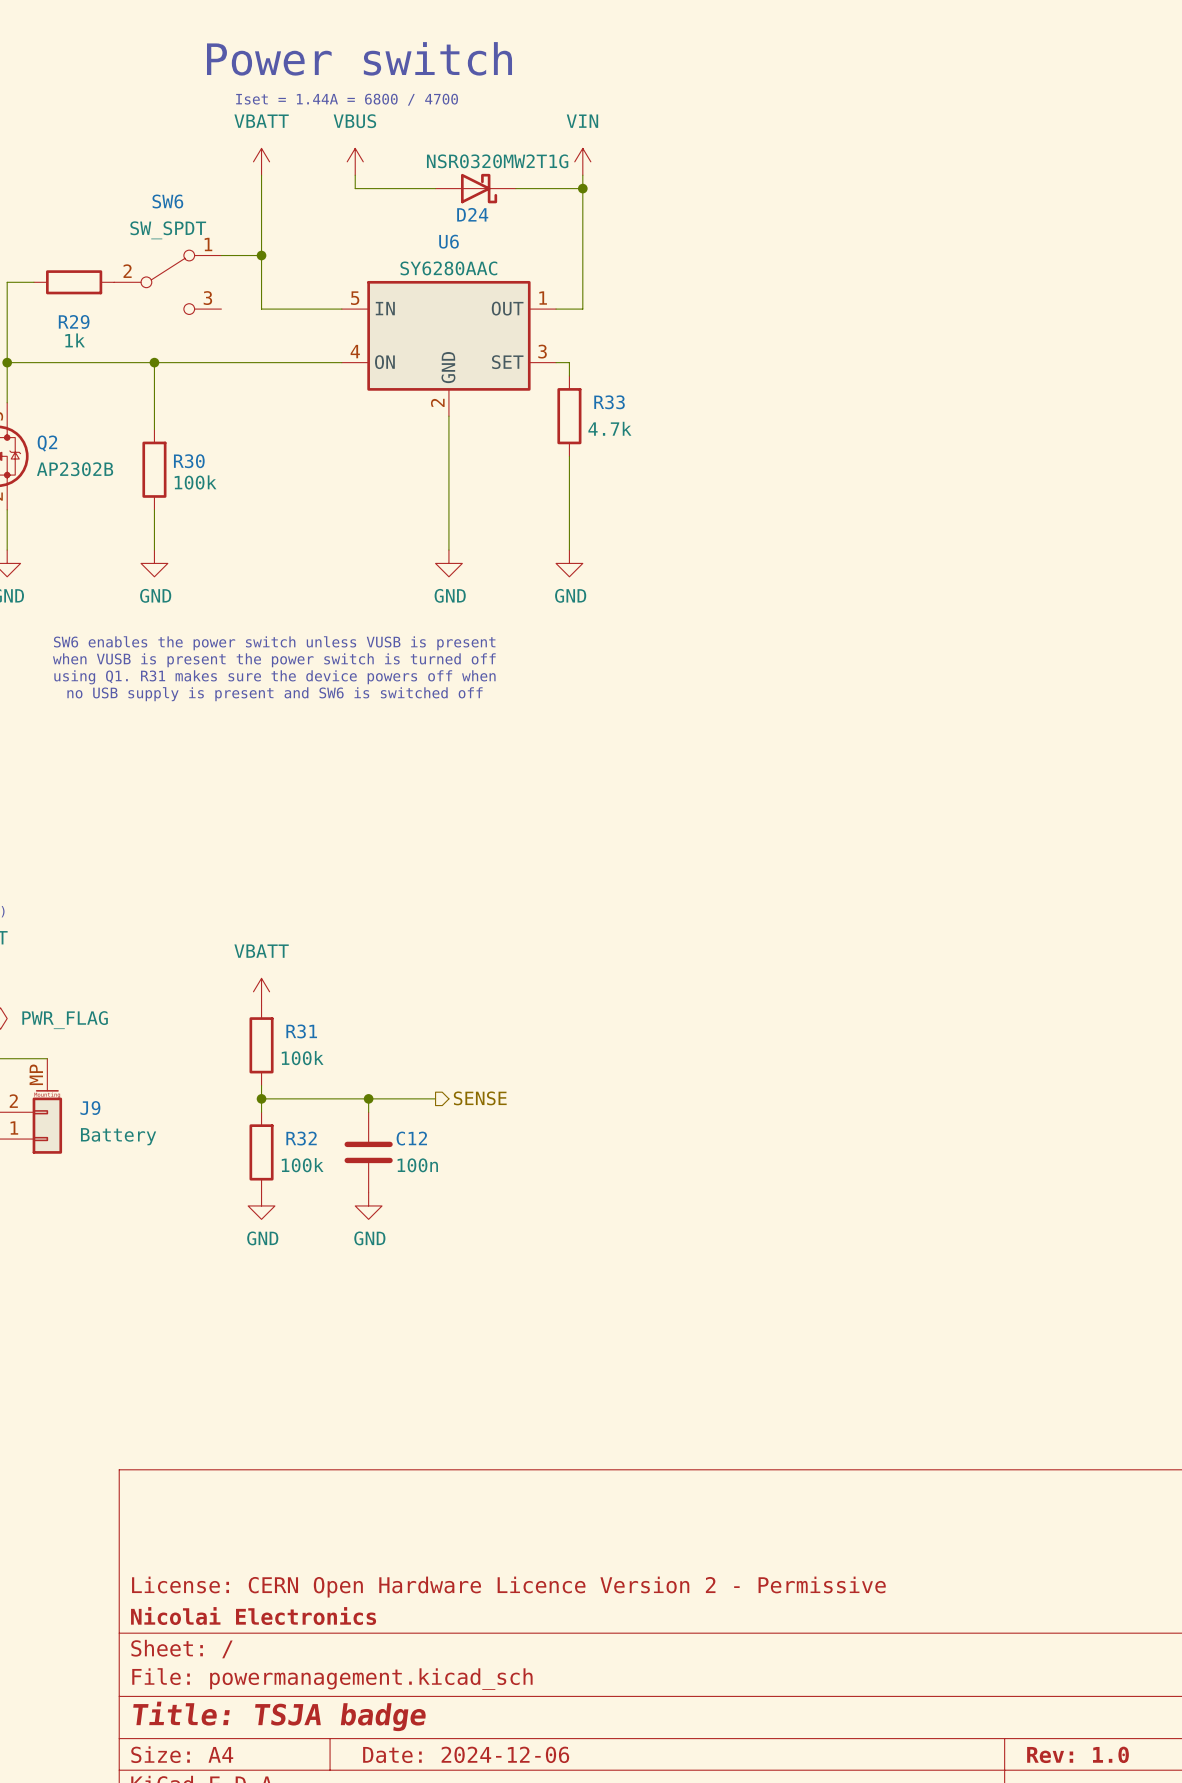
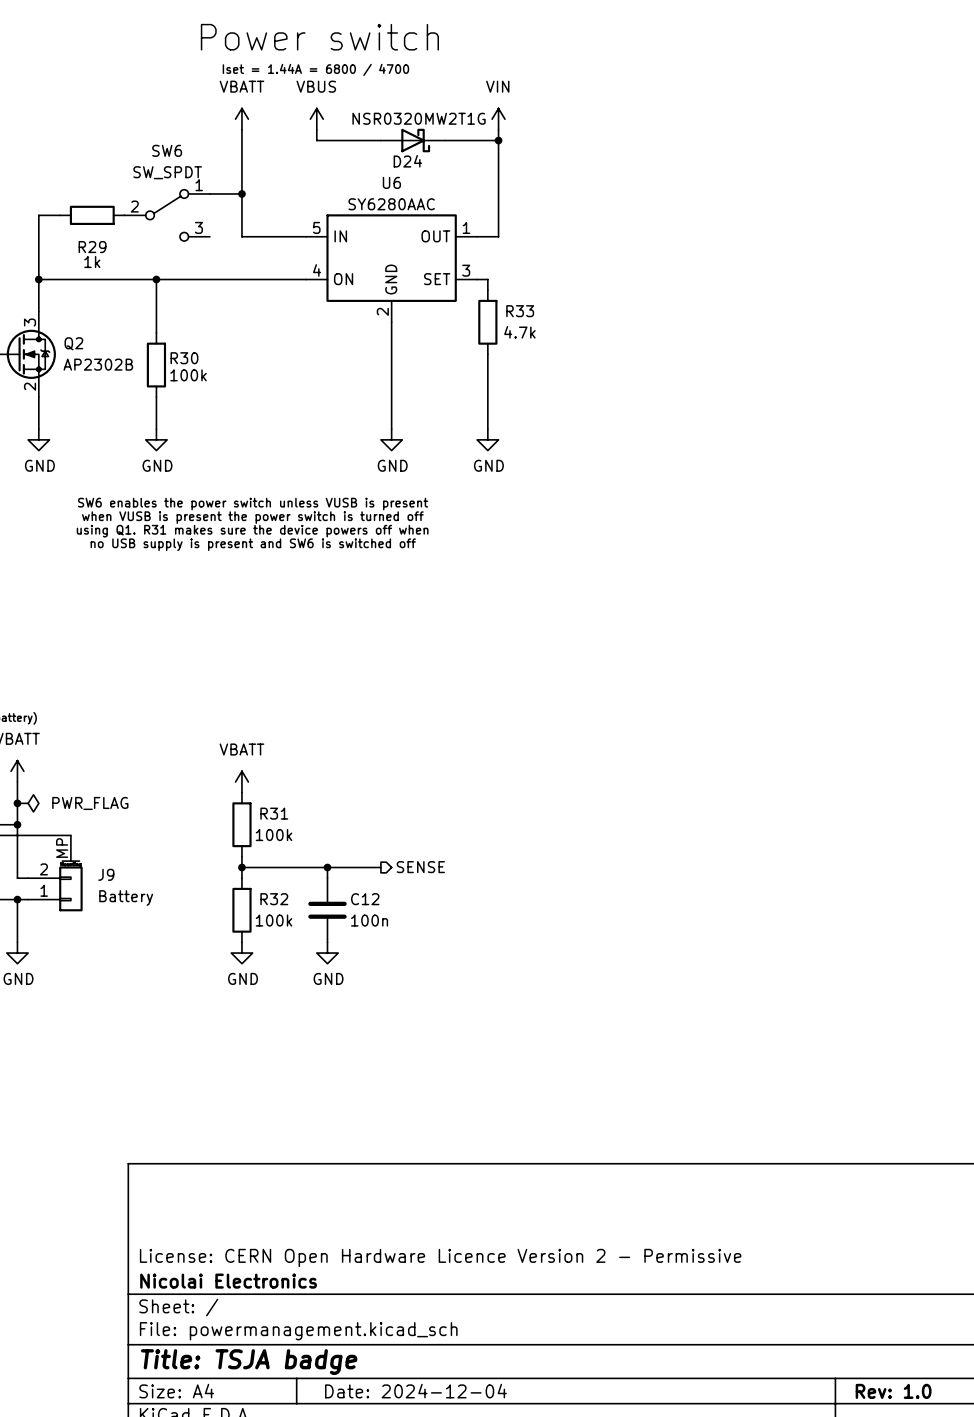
title block: Date: 2024-12-06 (466, 1754) -> Date: 2024-12-04 (415, 1391)

